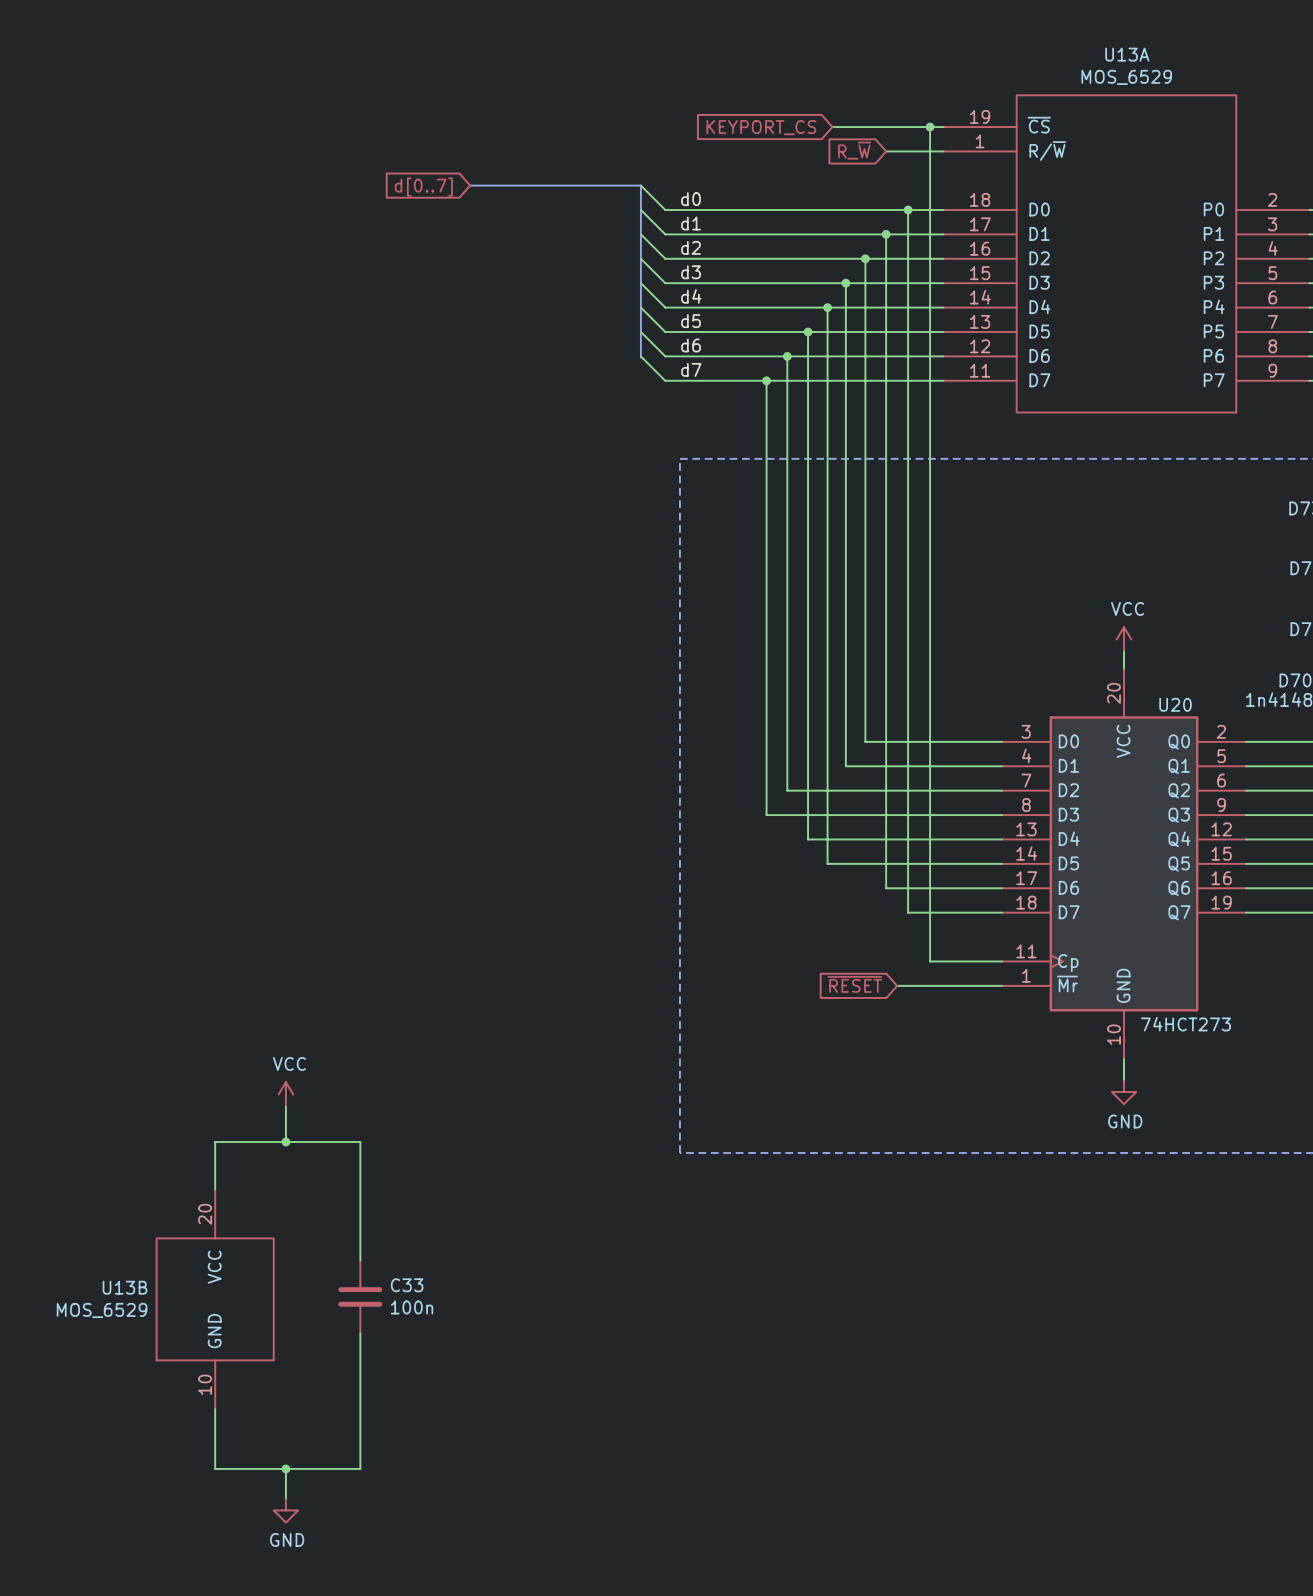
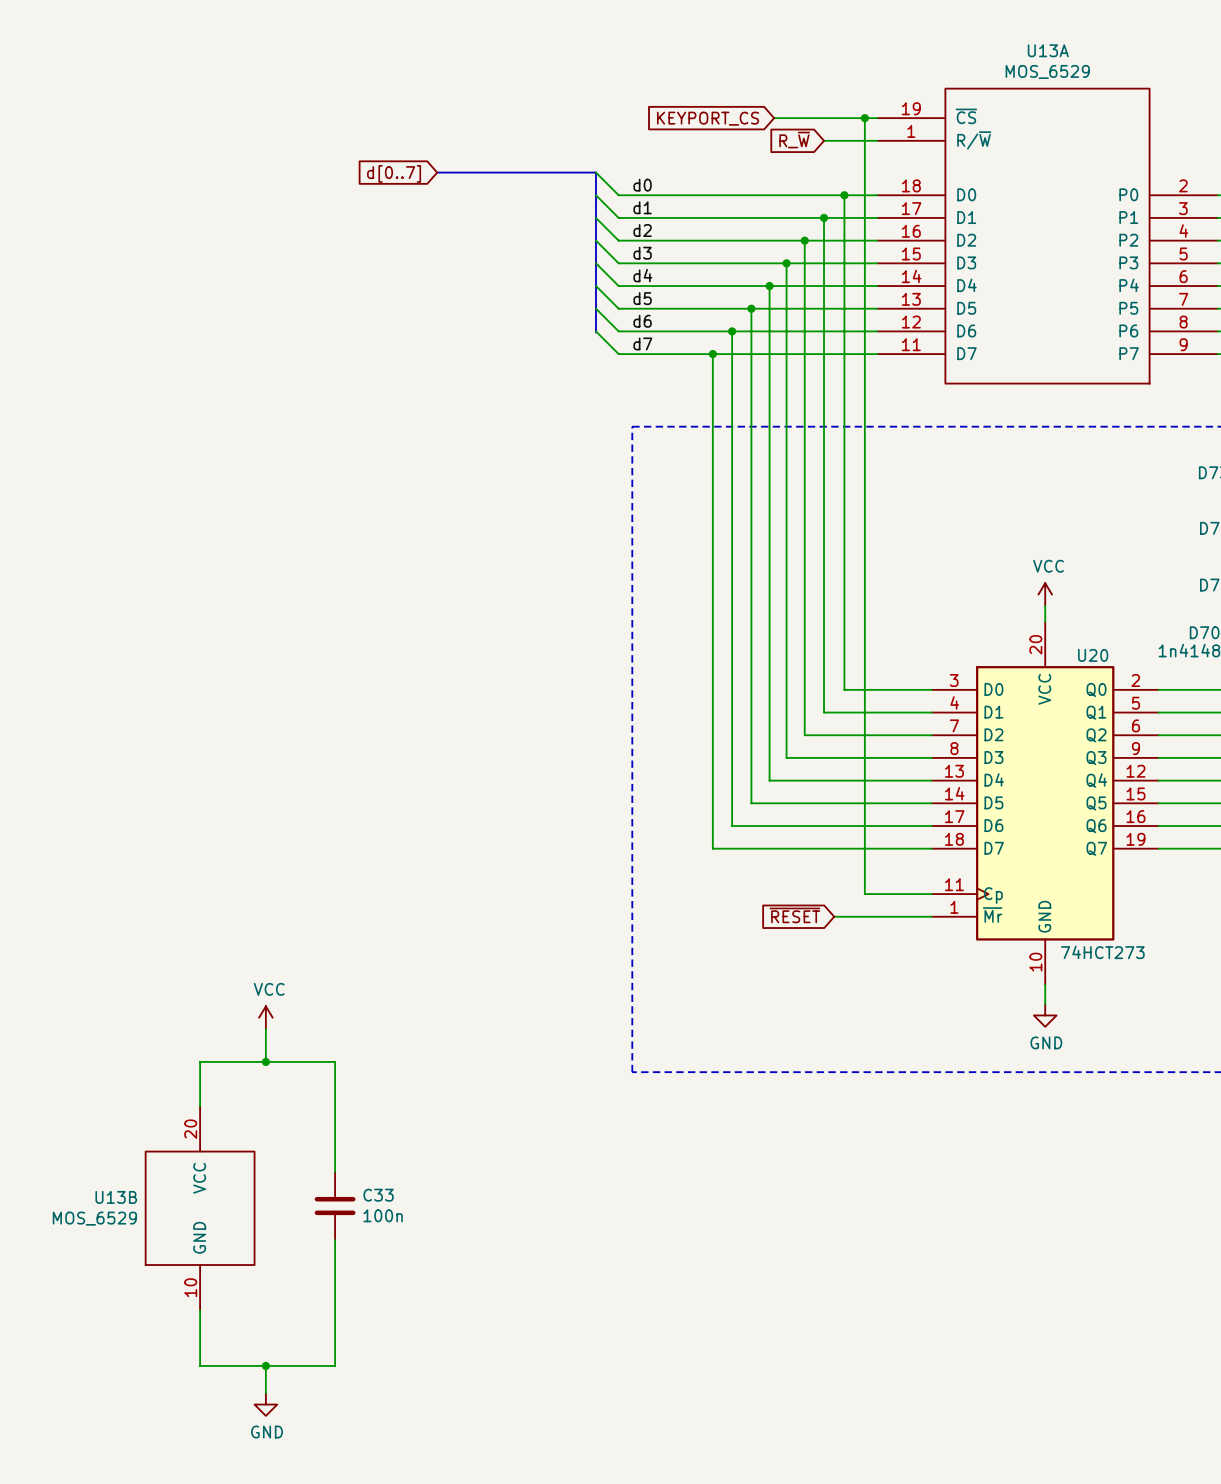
wire: (865, 741) (908, 741) (908, 912) -> (712, 757) (712, 848) (844, 848)
wire: (845, 766) (886, 766) (886, 888) -> (732, 735) (732, 826) (824, 826)
wire: (787, 790) (865, 790) -> (804, 689) (804, 735)
wire: (766, 815) (845, 815) -> (786, 712) (786, 757)
wire: (808, 839) (827, 839) (827, 863) -> (751, 780) (751, 803) (769, 803)

